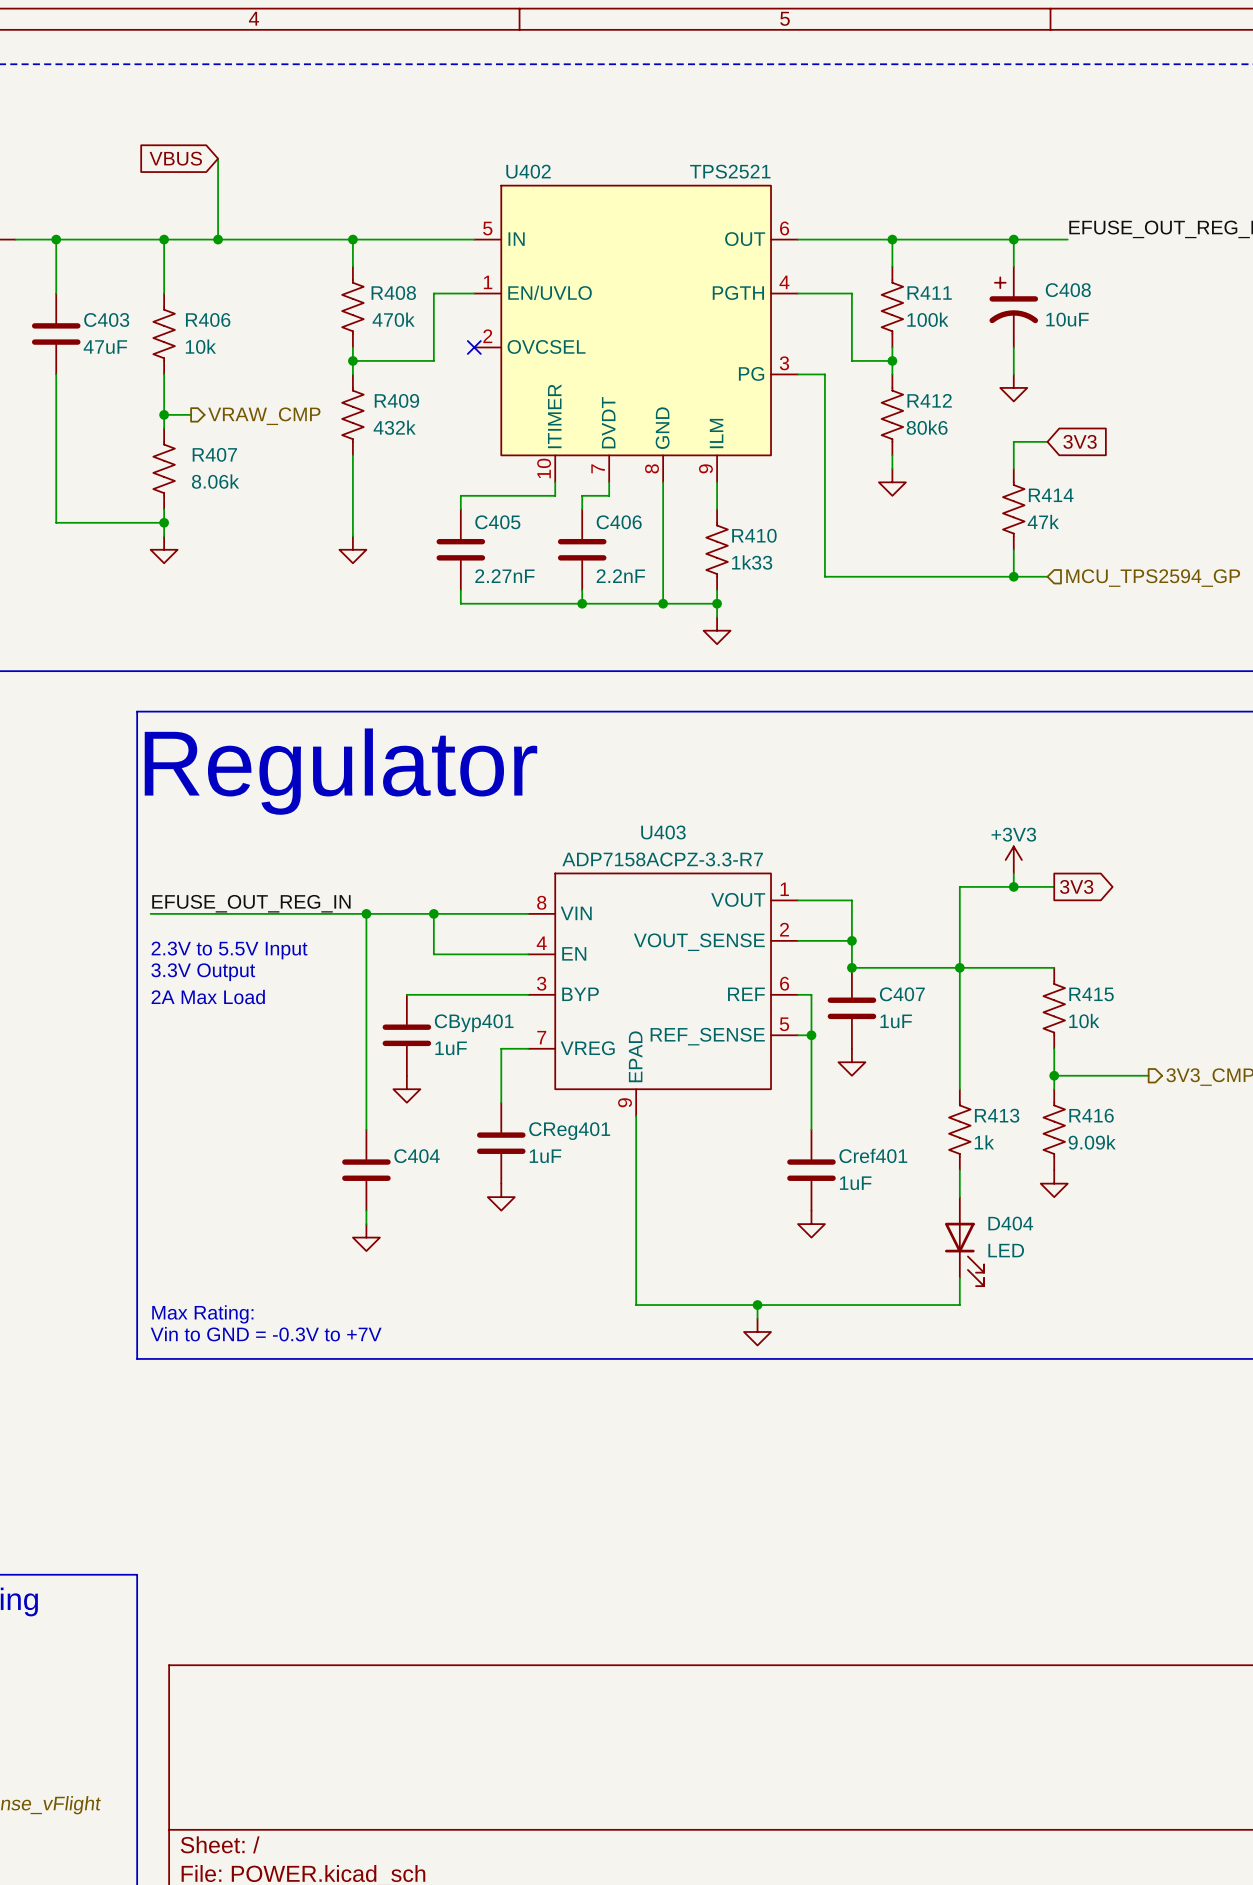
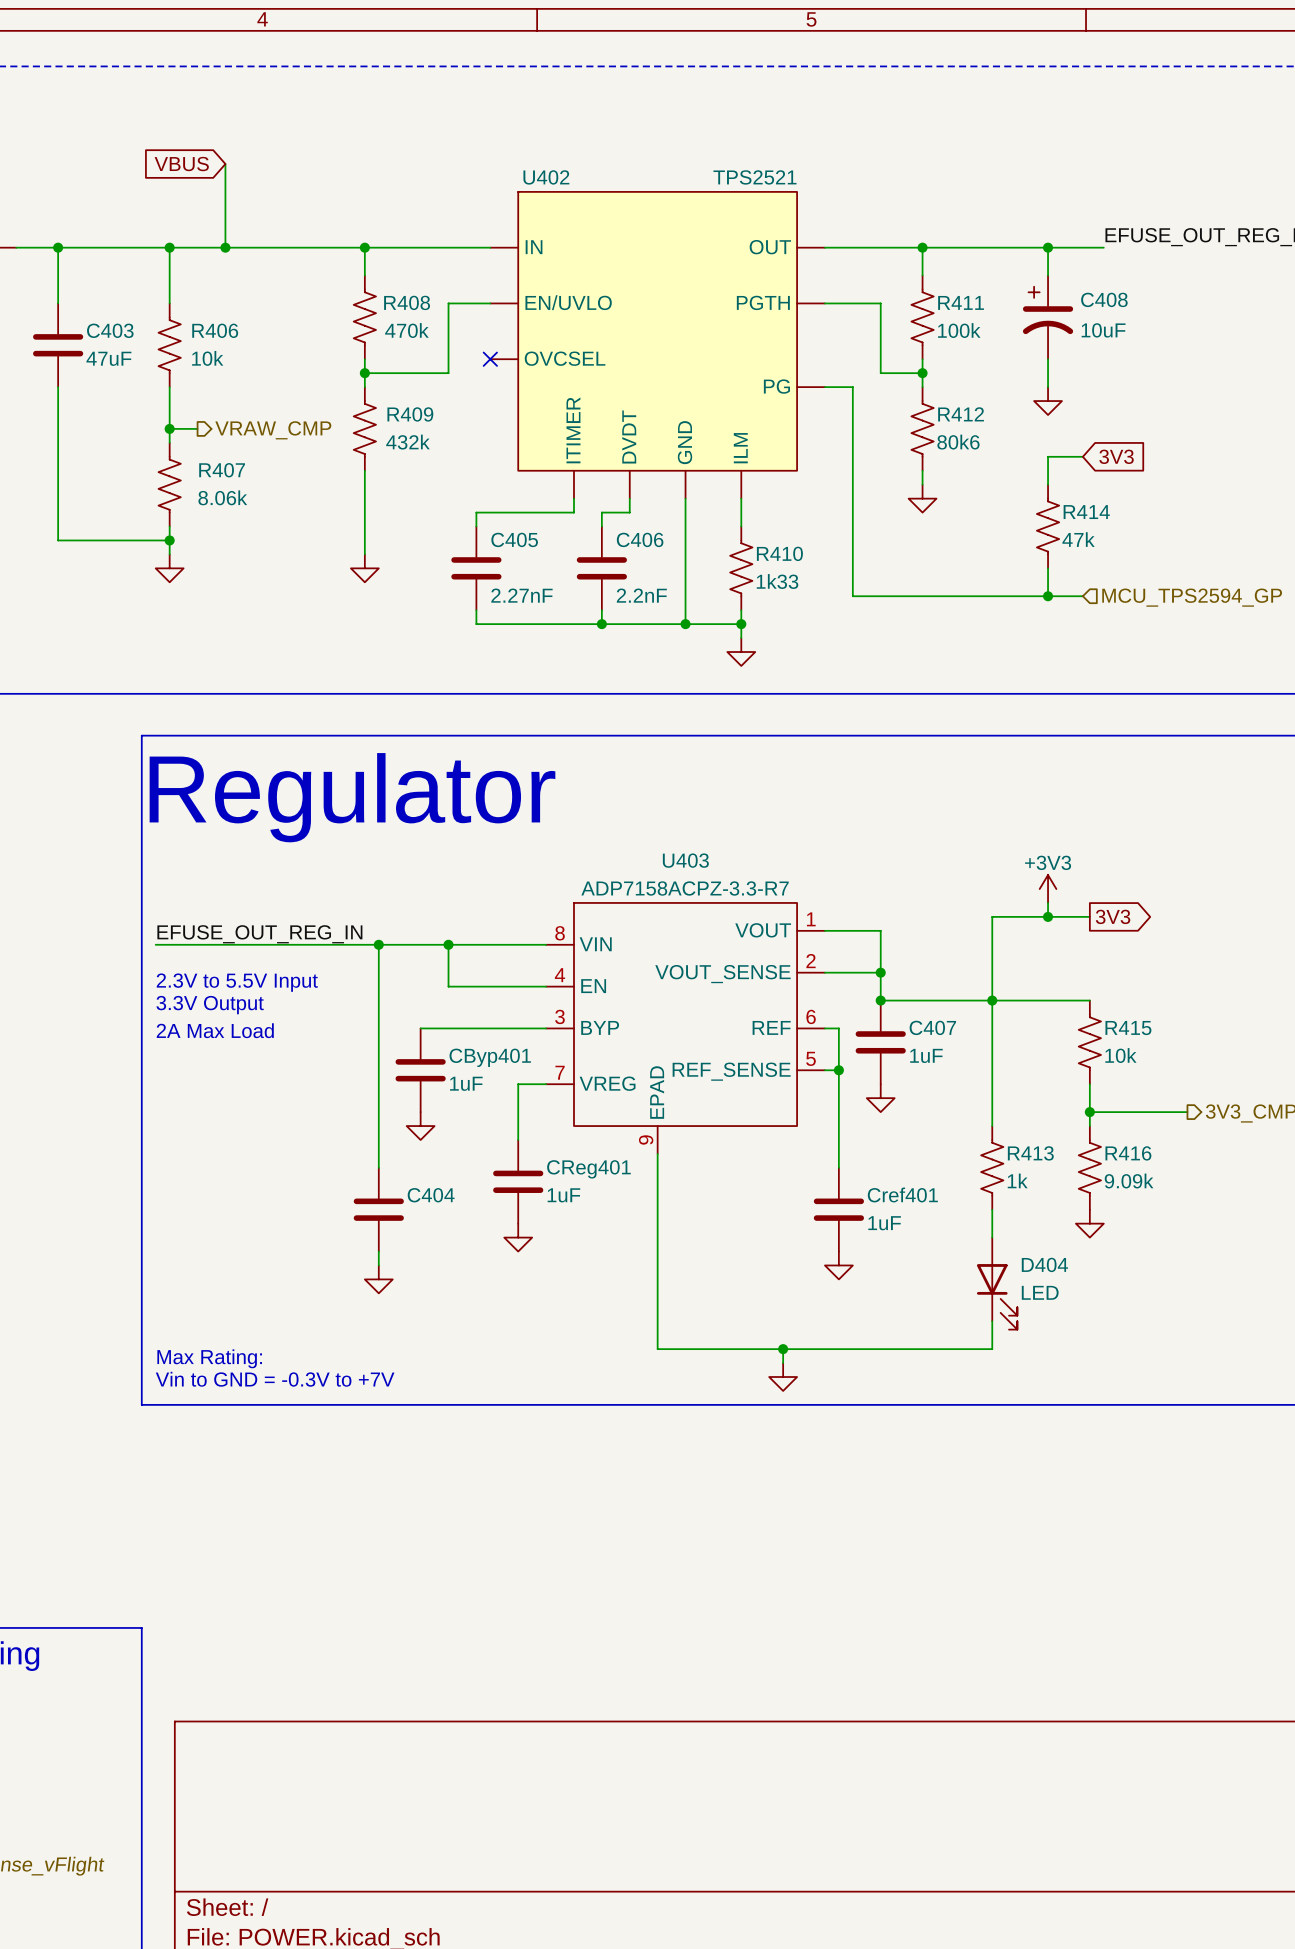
U402 symbol: [474, 185, 798, 483] -> [490, 191, 825, 499]

